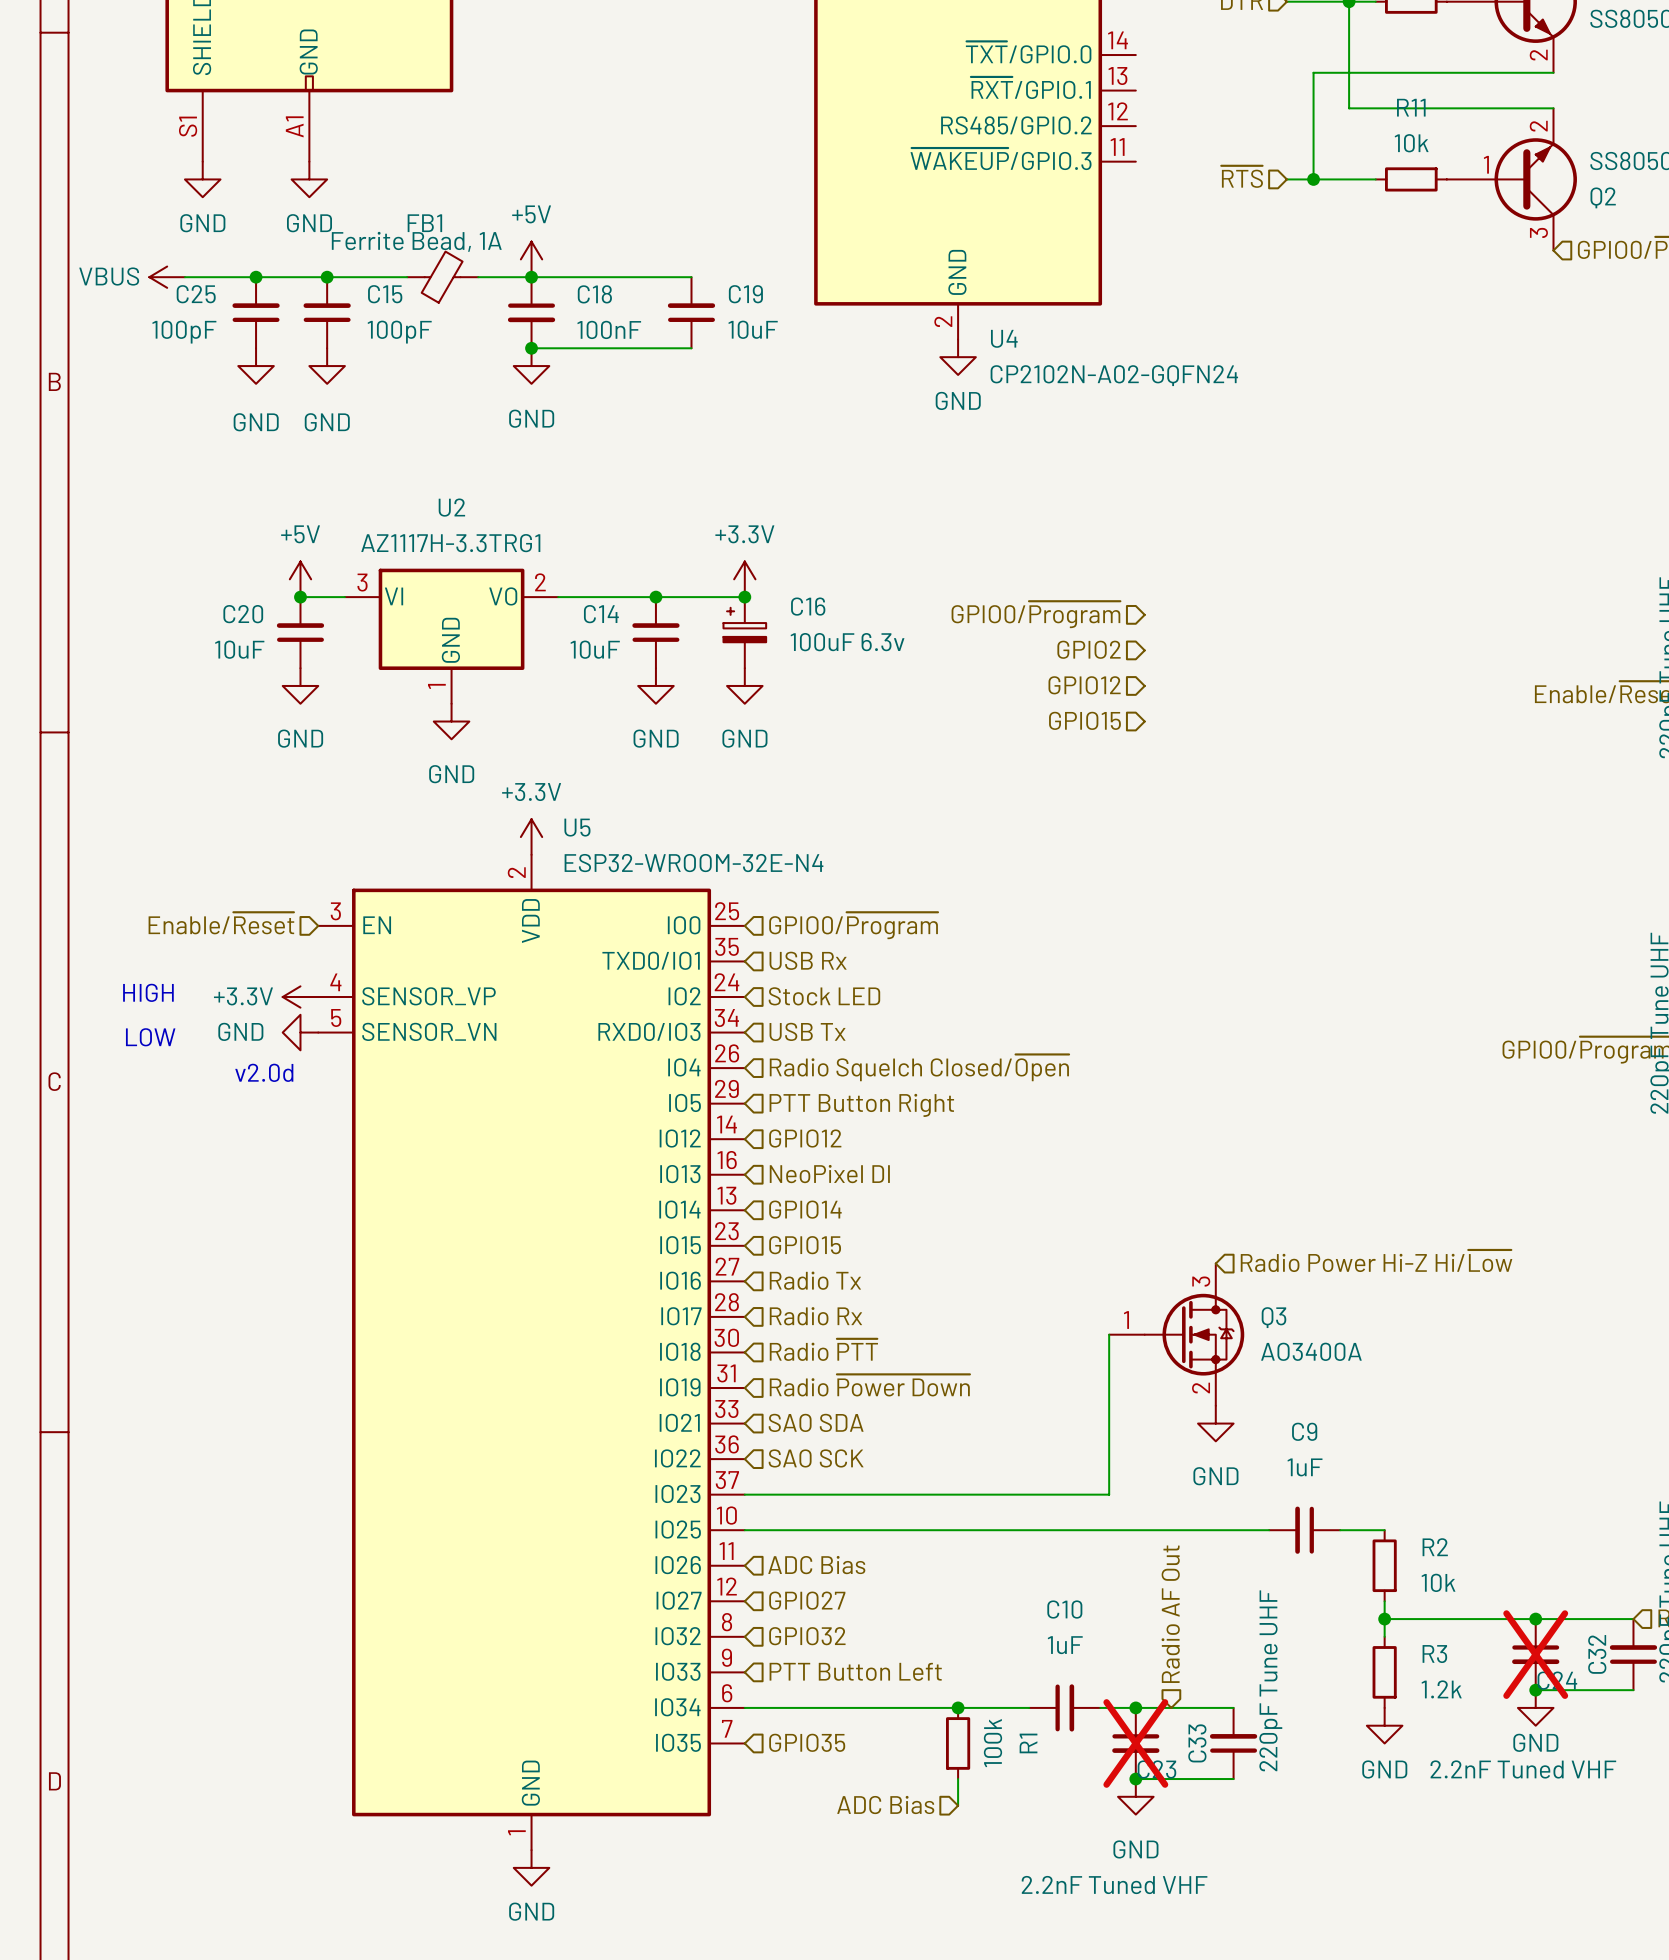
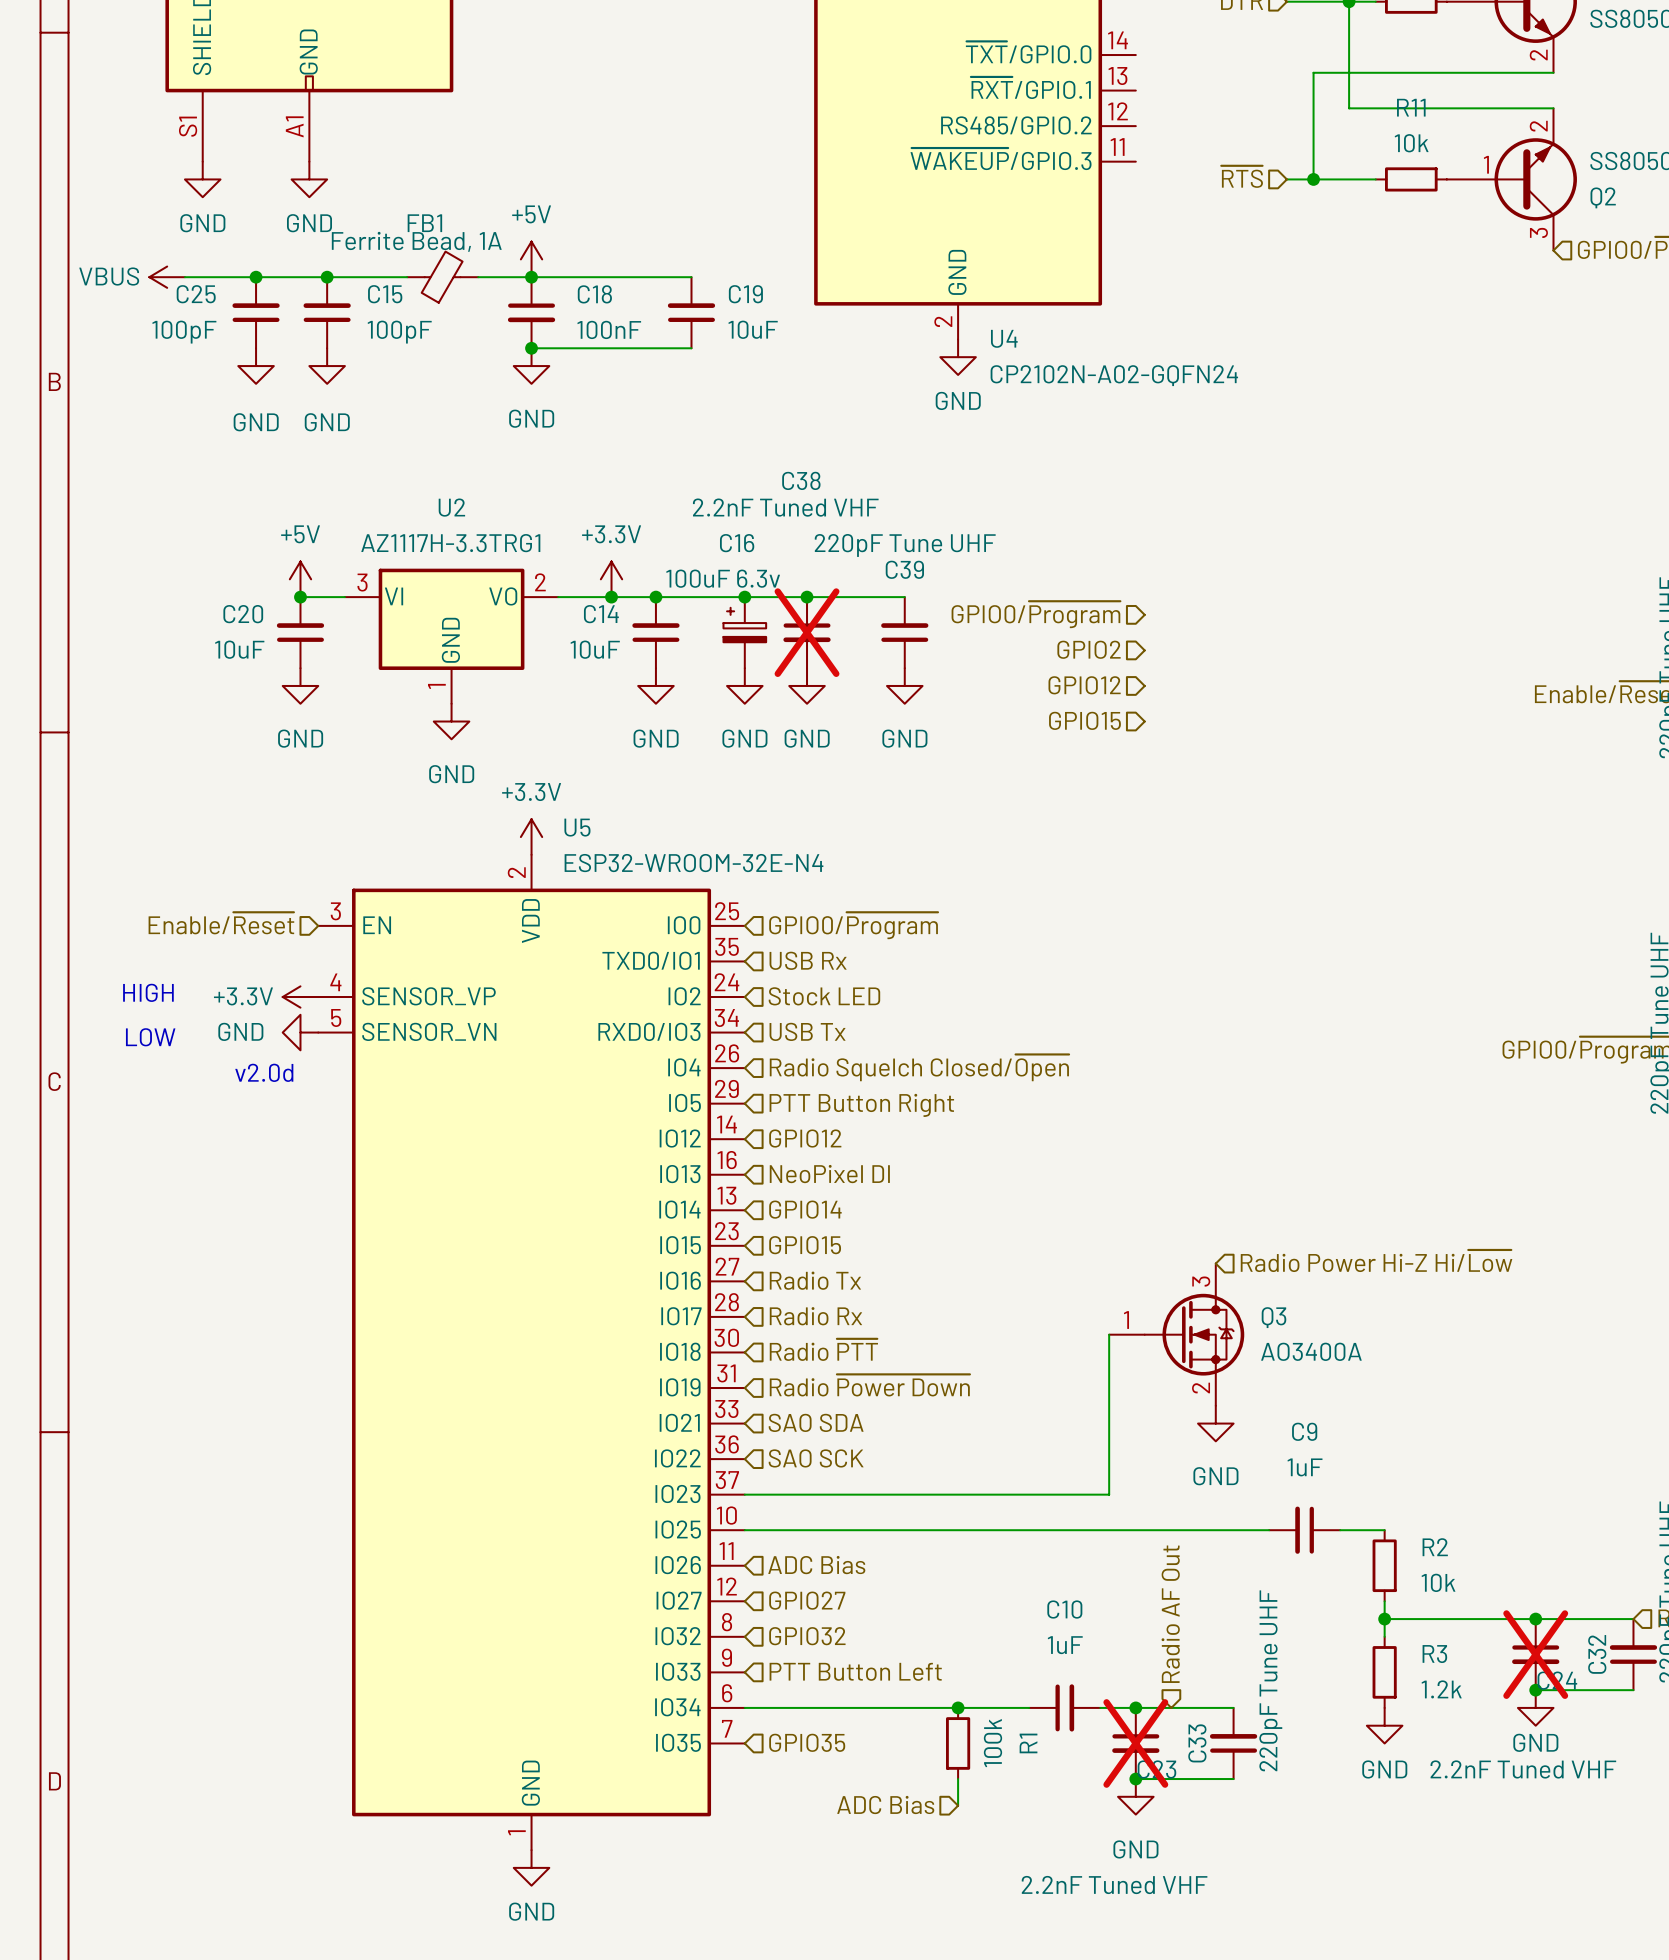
power symbol position: +3.3V (744, 579) -> +3.3V (611, 579)
junction: none -> (611, 597)
wire: none -> (744, 597) (904, 597)
junction: none -> (807, 597)
C16 name position: C16 (808, 606) -> C16 (737, 543)
C38: none -> 2.2nF Tuned VHF (807, 632)
C39: none -> 220pF Tune UHF (904, 632)
C16 value position: 100uF 6.3v (847, 642) -> 100uF 6.3v (723, 578)
power symbol: none -> GND (807, 685)
power symbol: none -> GND (904, 685)

